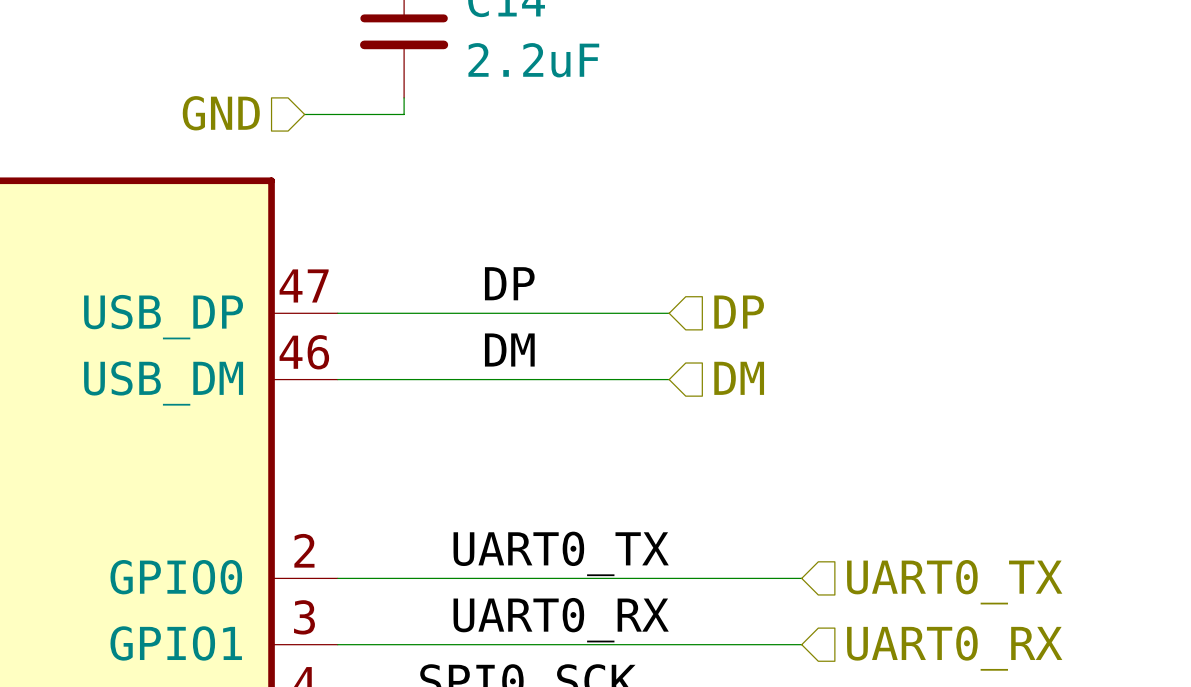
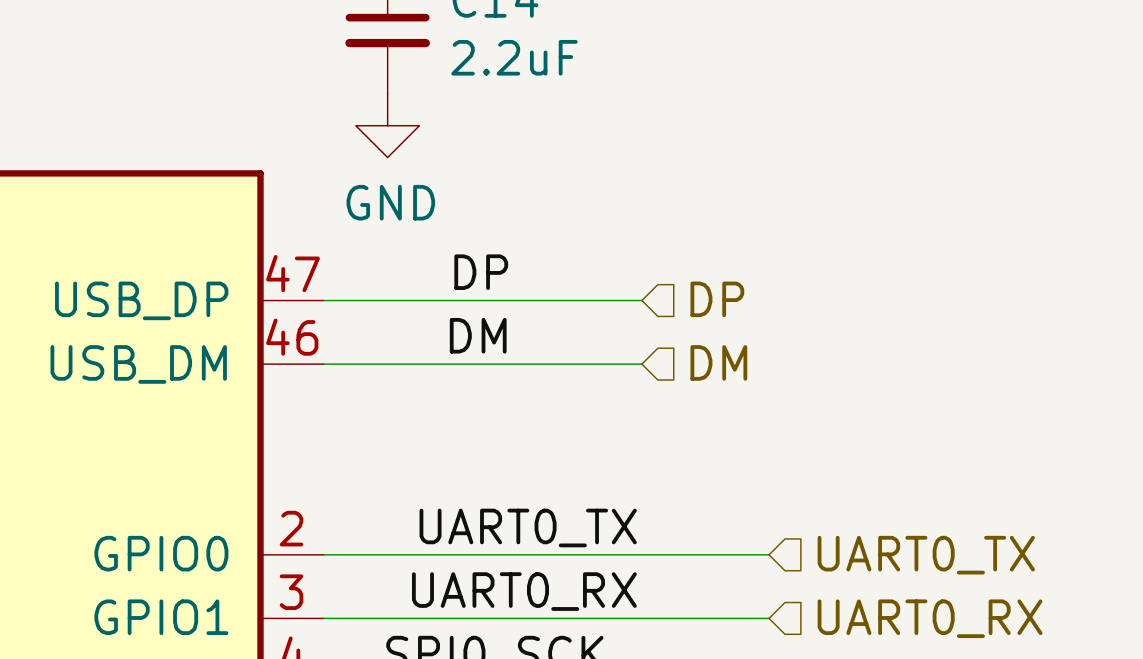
wire: (404, 97) (404, 114) (304, 114) -> none
hierarchical label: GND (221, 113) -> none
power symbol: none -> GND (387, 125)

